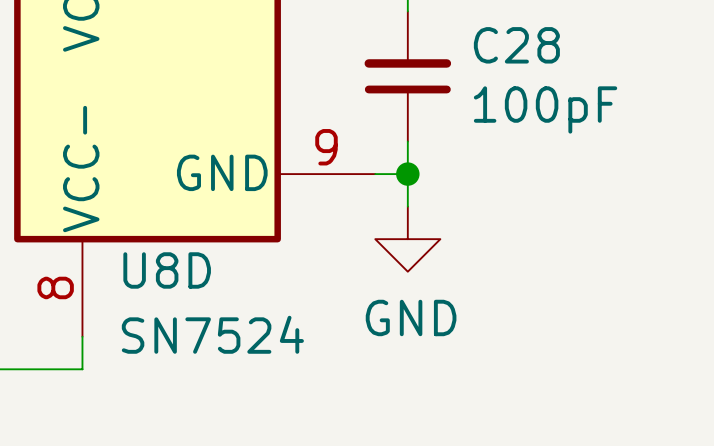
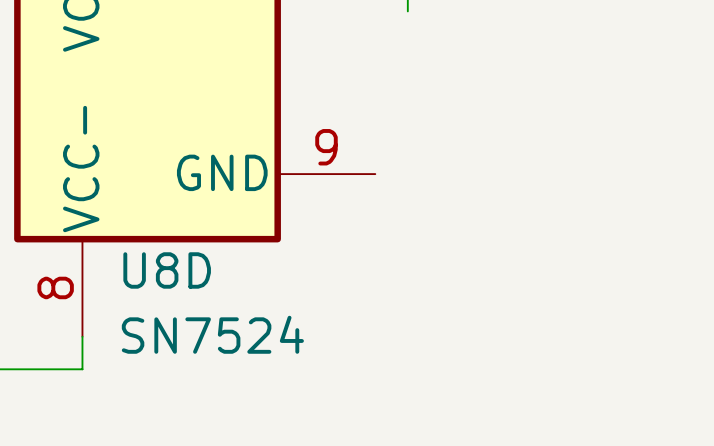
C28: 100pF (407, 76) -> none
wire: (407, 141) (407, 206) -> none
wire: (375, 174) (407, 174) -> none
junction: (407, 174) -> none
power symbol: GND (407, 239) -> none

